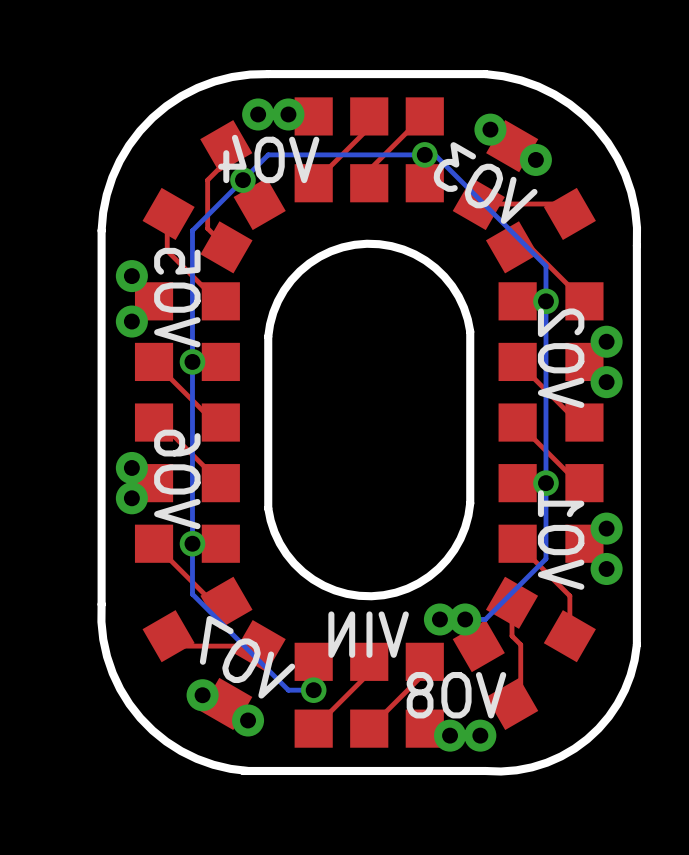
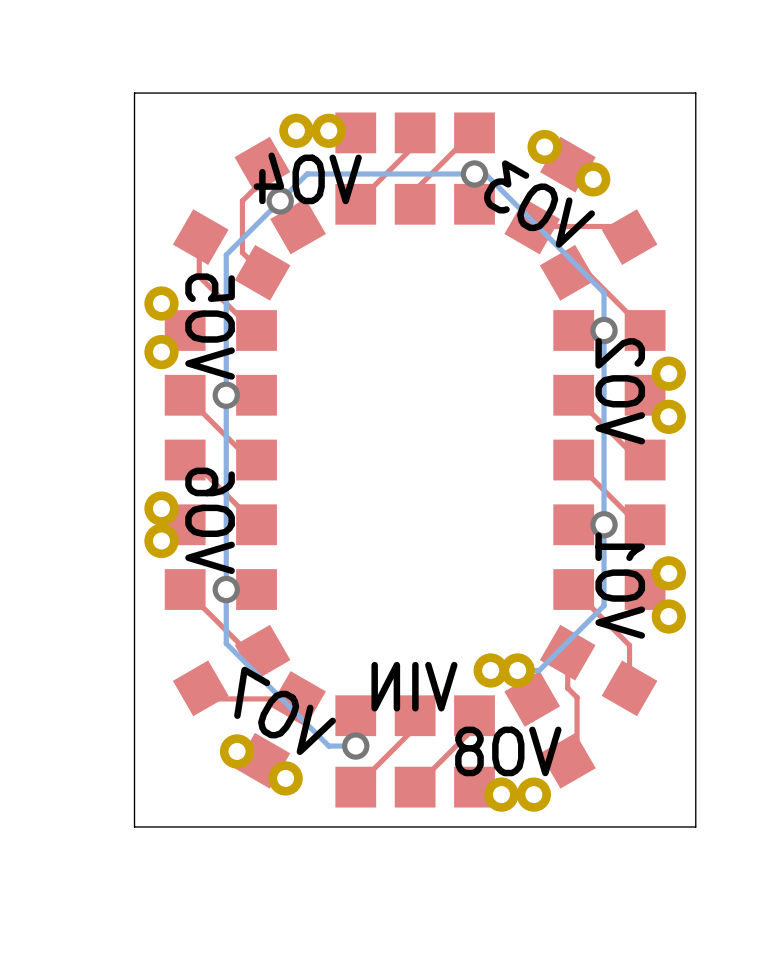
board edge: none -> (695, 93) (134, 93) (134, 826) (695, 826) (695, 93)
board edge: (470, 331) (470, 503) (465, 527) (454, 549) (438, 568) (429, 576) (395, 592) (371, 596) (346, 593) (335, 590) (312, 579) (286, 553) (274, 532) (268, 508) (268, 336) (273, 312) (284, 290) (299, 271) (319, 256) (330, 251) (354, 244) (379, 244) (391, 246) (414, 254) (435, 267) (444, 276) (463, 307) (470, 331) -> none
board edge: (248, 770) (230, 768) (196, 758) (166, 741) (152, 730) (140, 717) (120, 689) (107, 656) (101, 621) (101, 230) (106, 194) (112, 177) (129, 145) (152, 117) (181, 96) (197, 87) (232, 77) (268, 74) (485, 74) (503, 76) (538, 86) (569, 104) (596, 128) (617, 158) (625, 174) (635, 209) (637, 227) (636, 644) (634, 660) (624, 689) (608, 716) (587, 739) (561, 756) (531, 767) (501, 771) (242, 770) -> none

